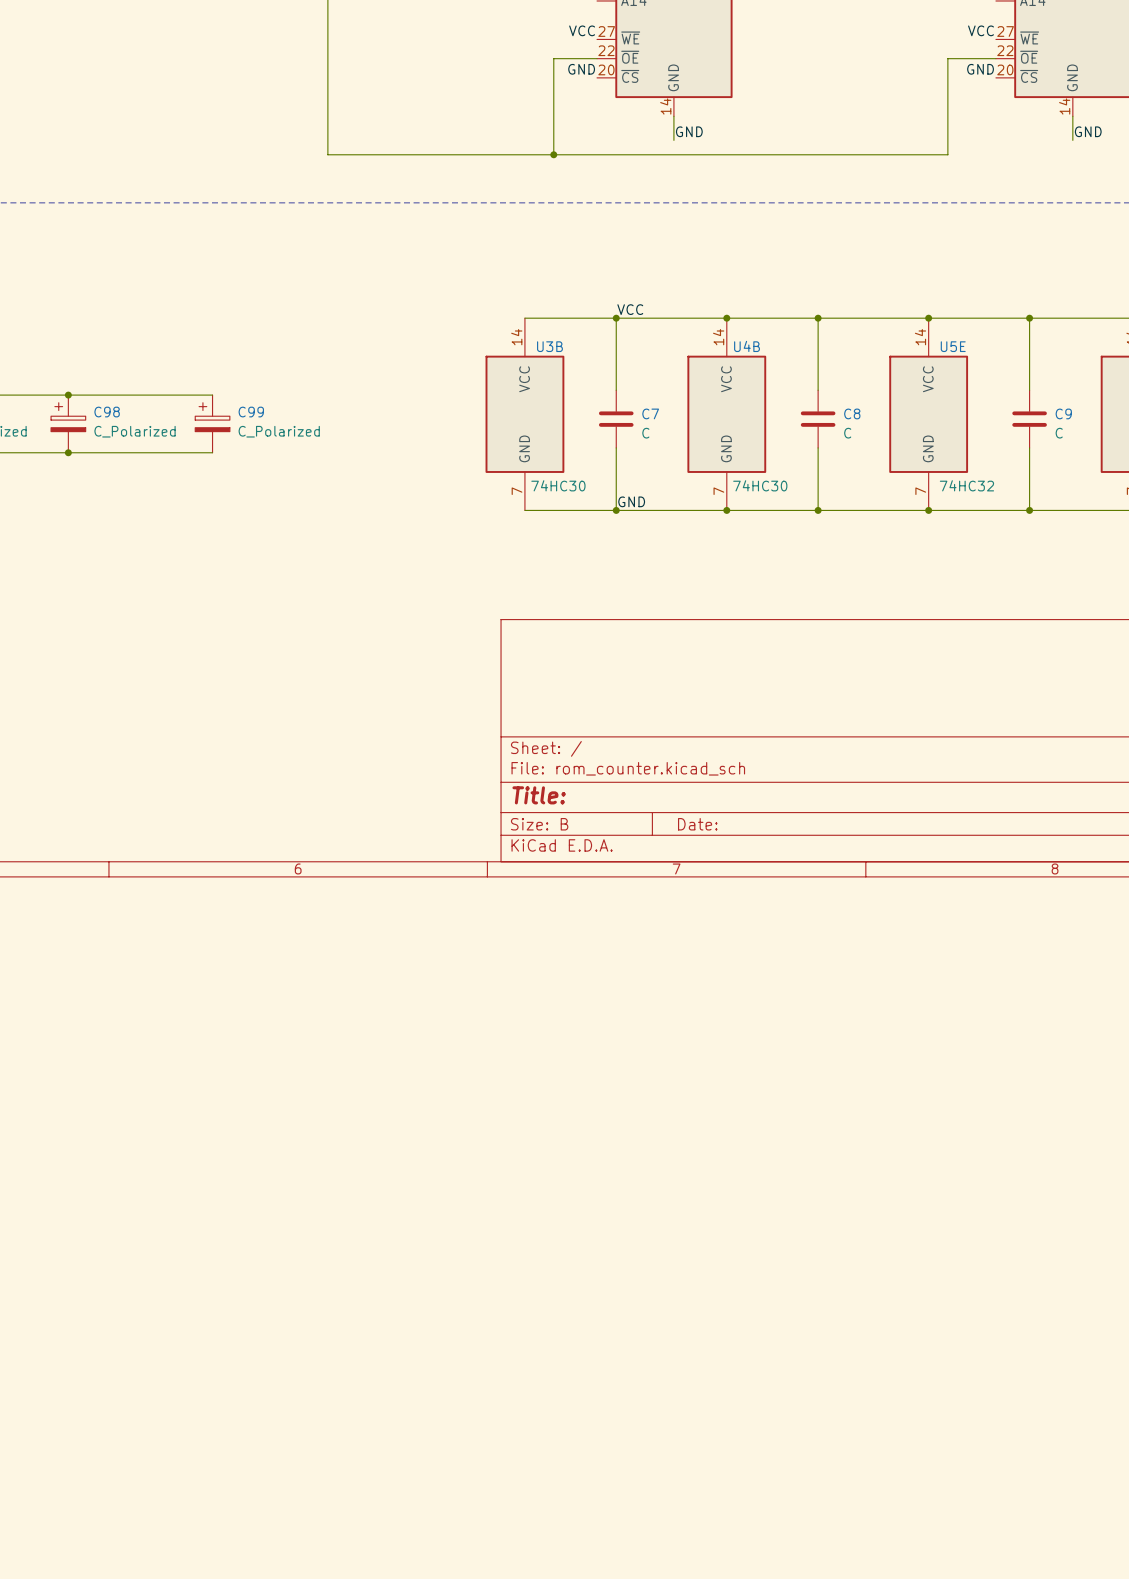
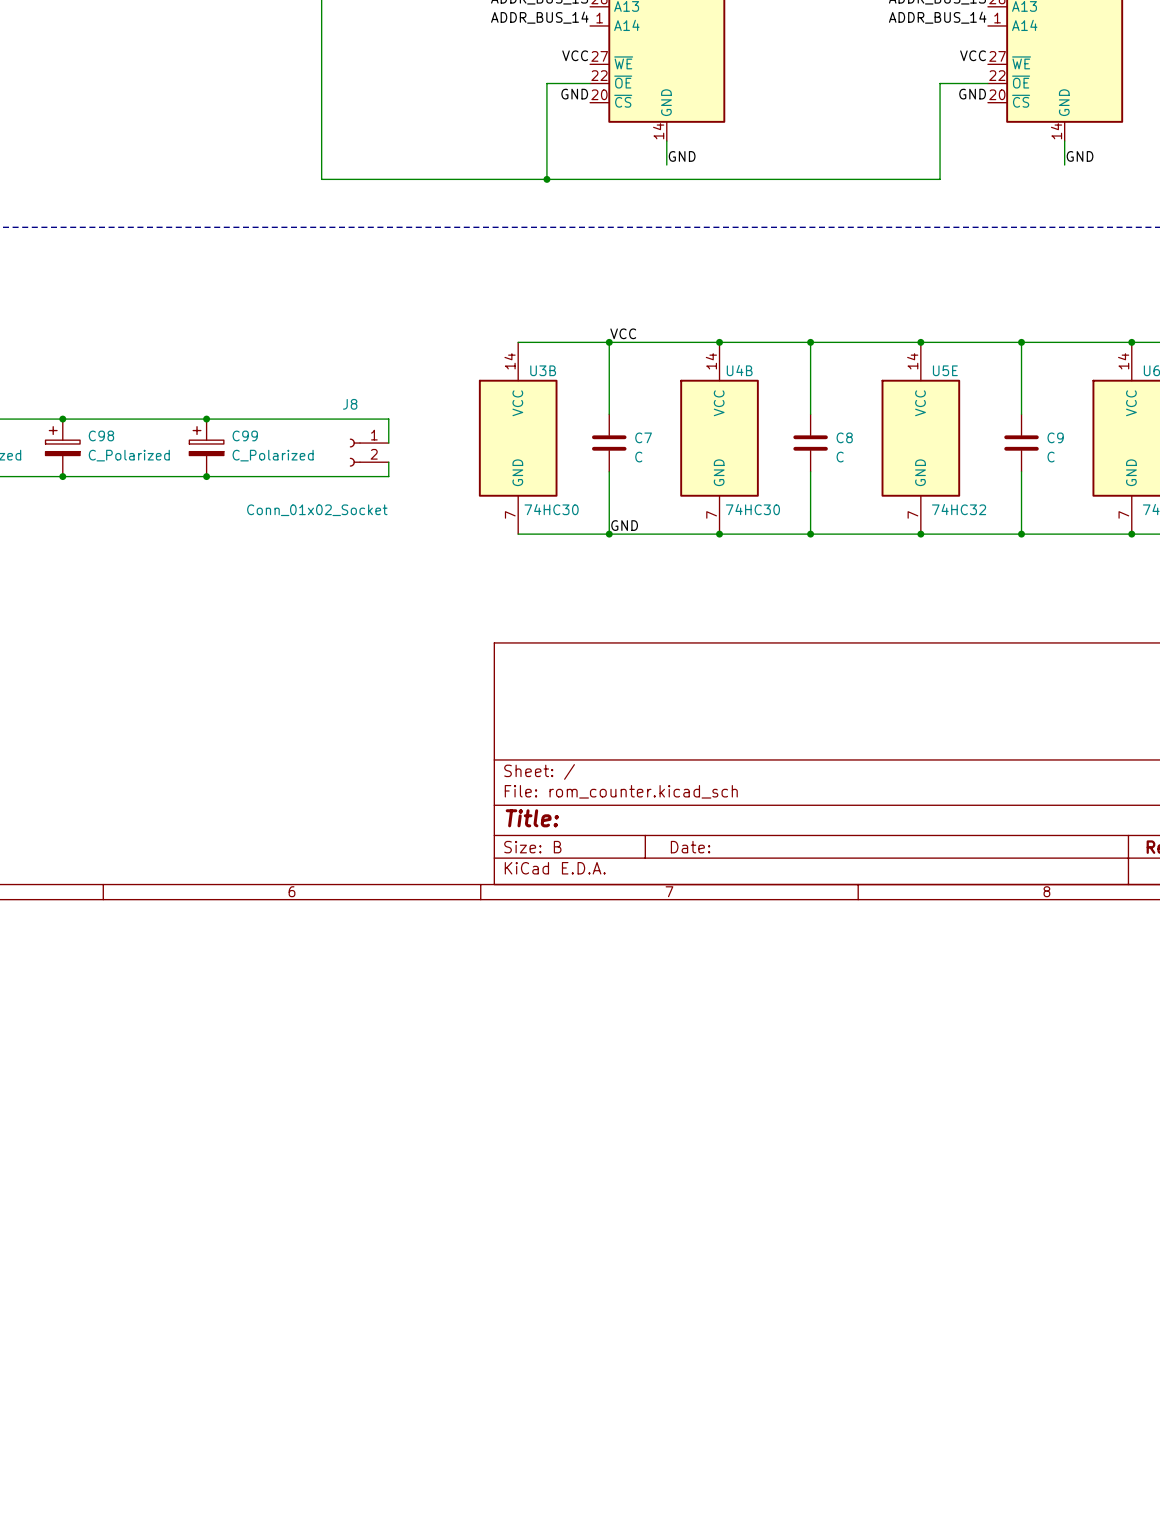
wire: none -> (206, 419) (388, 419) (388, 443)
junction: none -> (206, 419)
J8: none -> Conn_01x02_Socket (369, 452)
wire: none -> (388, 462) (388, 476) (206, 476)
junction: none -> (206, 476)

